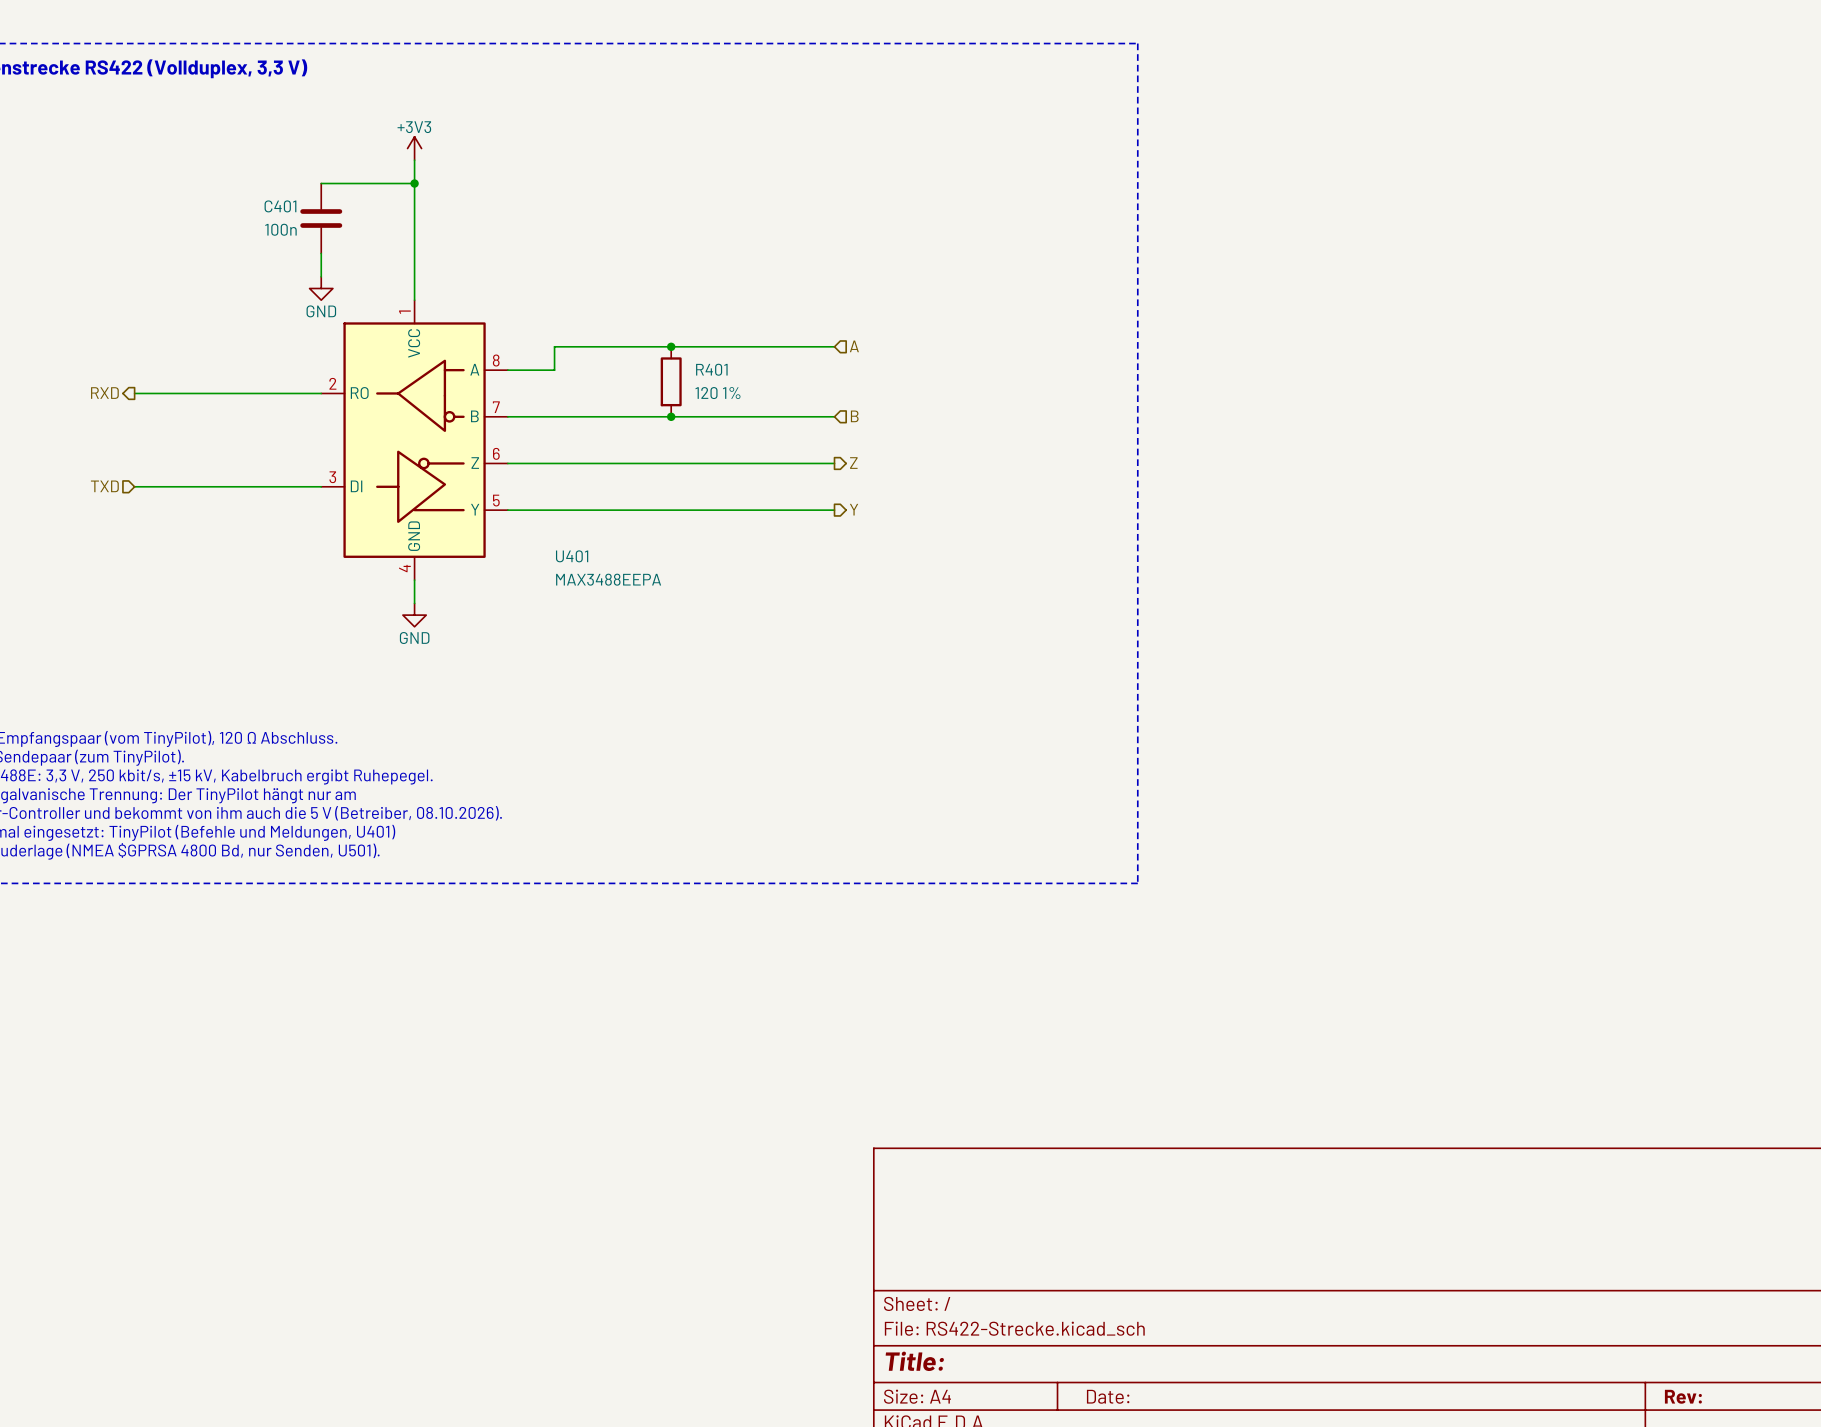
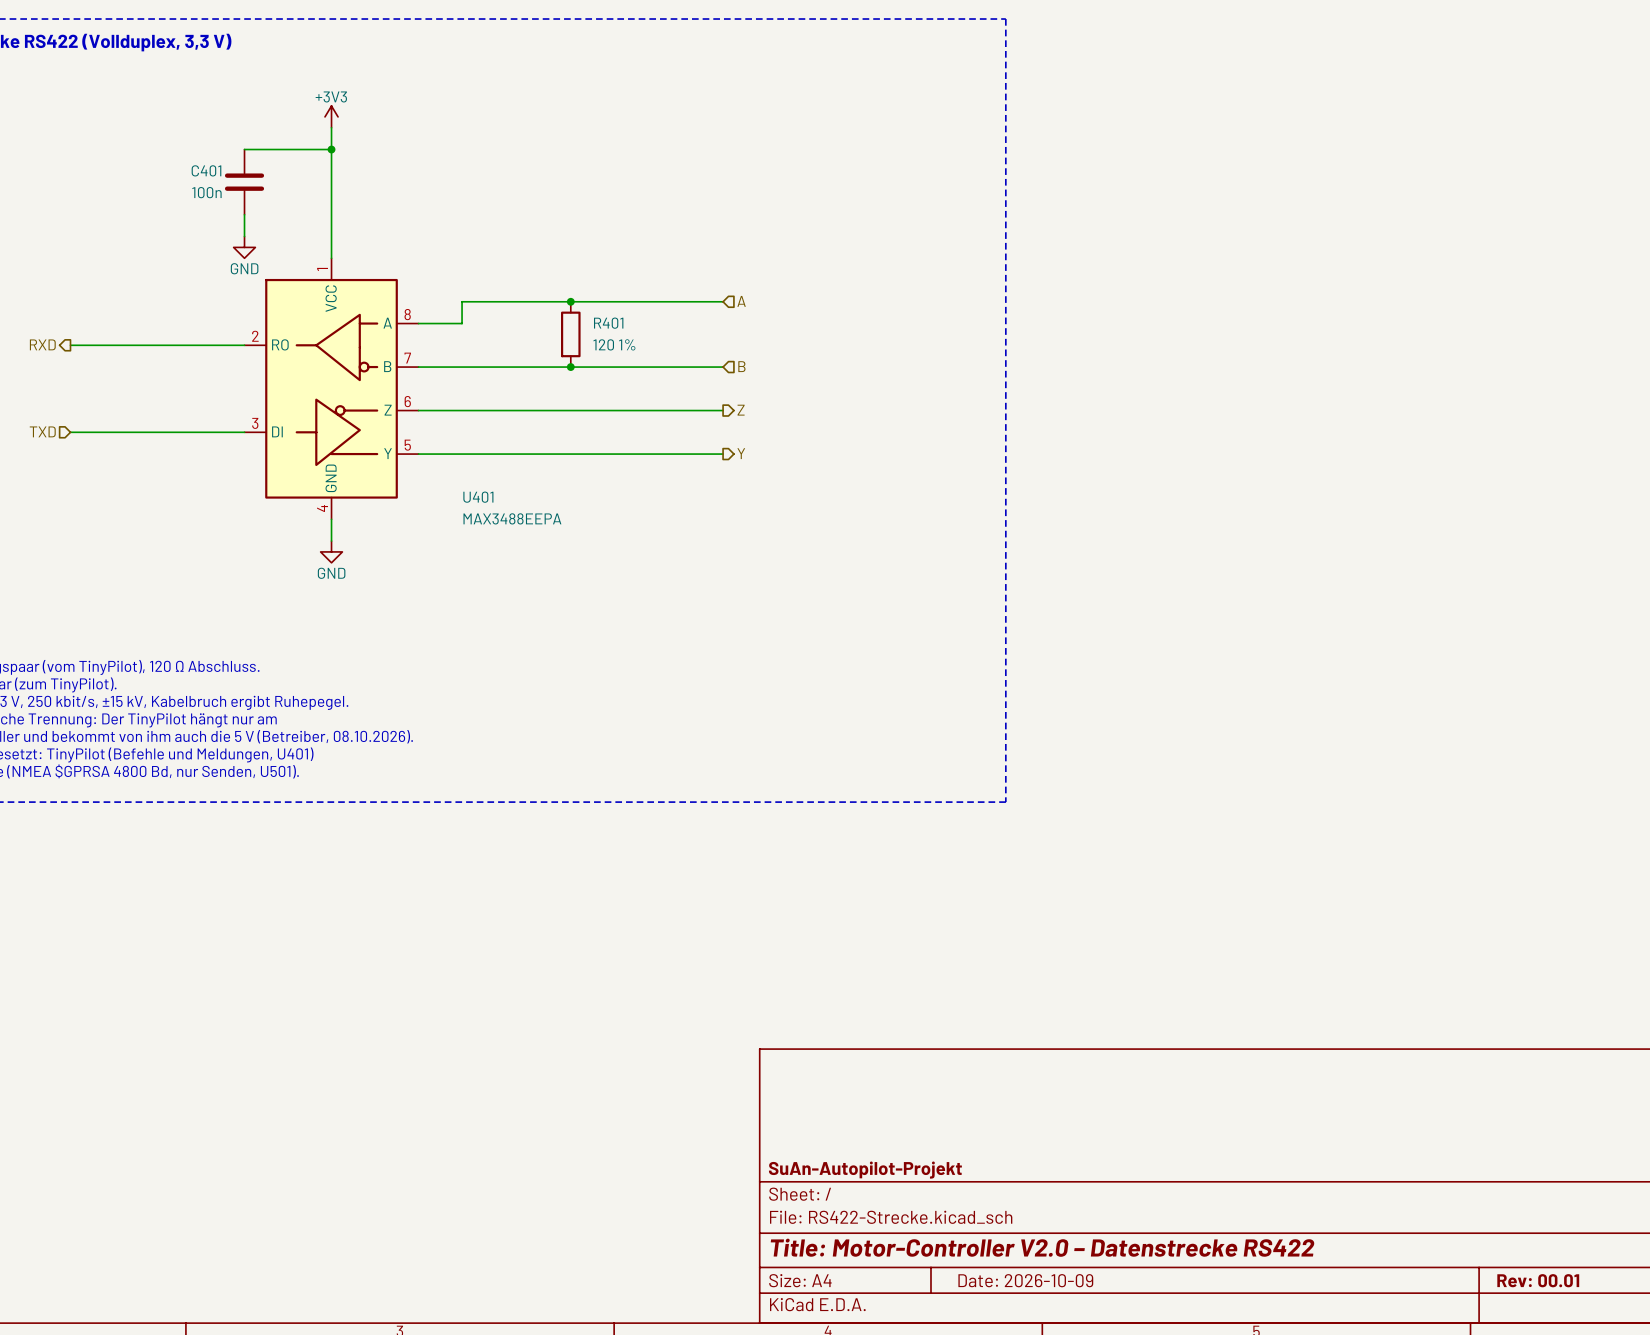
title block: none -> SuAn-Autopilot-Projekt (865, 1170)
title block: Title: (914, 1361) -> Title: Motor-Controller V2.0 – Datenstrecke RS422 (1042, 1247)
title block: Date: (1108, 1396) -> Date: 2026-10-09 (1025, 1280)
title block: Rev: (1683, 1396) -> Rev: 00.01 (1538, 1280)

